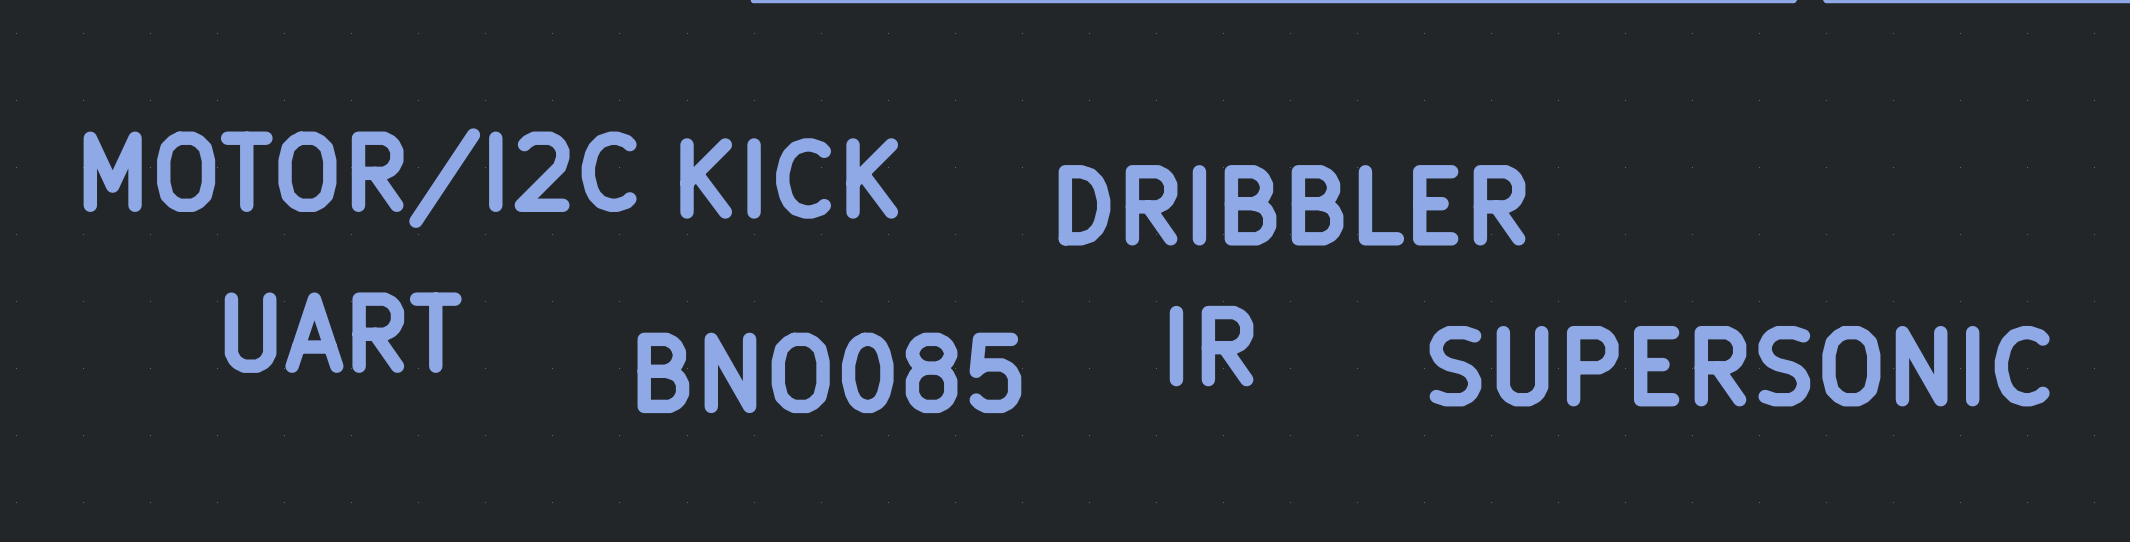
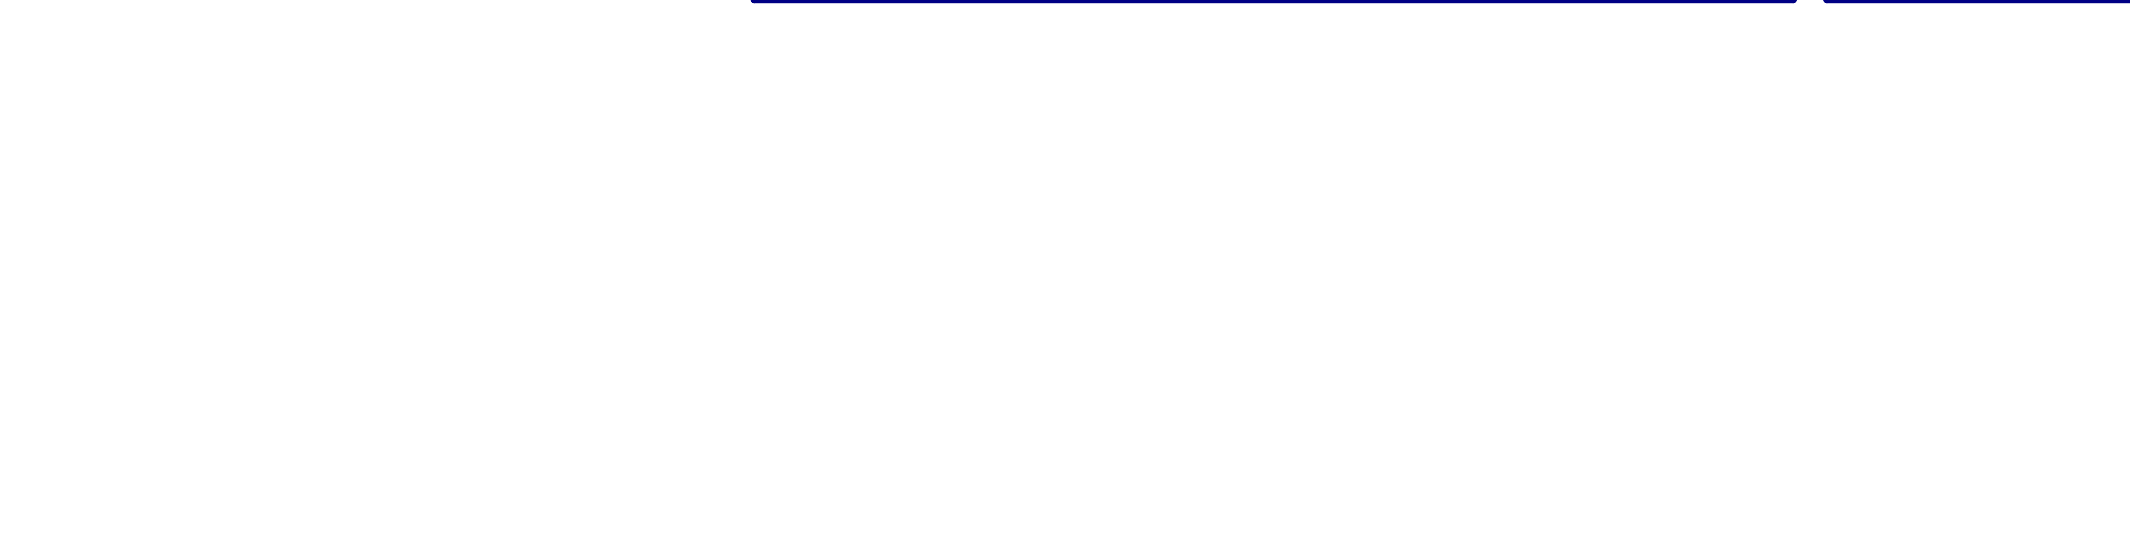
text: MOTOR/I2C (360, 178) -> none
text: KICK (789, 178) -> none
text: DRIBBLER (1292, 205) -> none
text: UART (343, 332) -> none
text: IR (1211, 346) -> none
text: SUPERSONIC (1739, 366) -> none
text: BNO085 (829, 372) -> none

